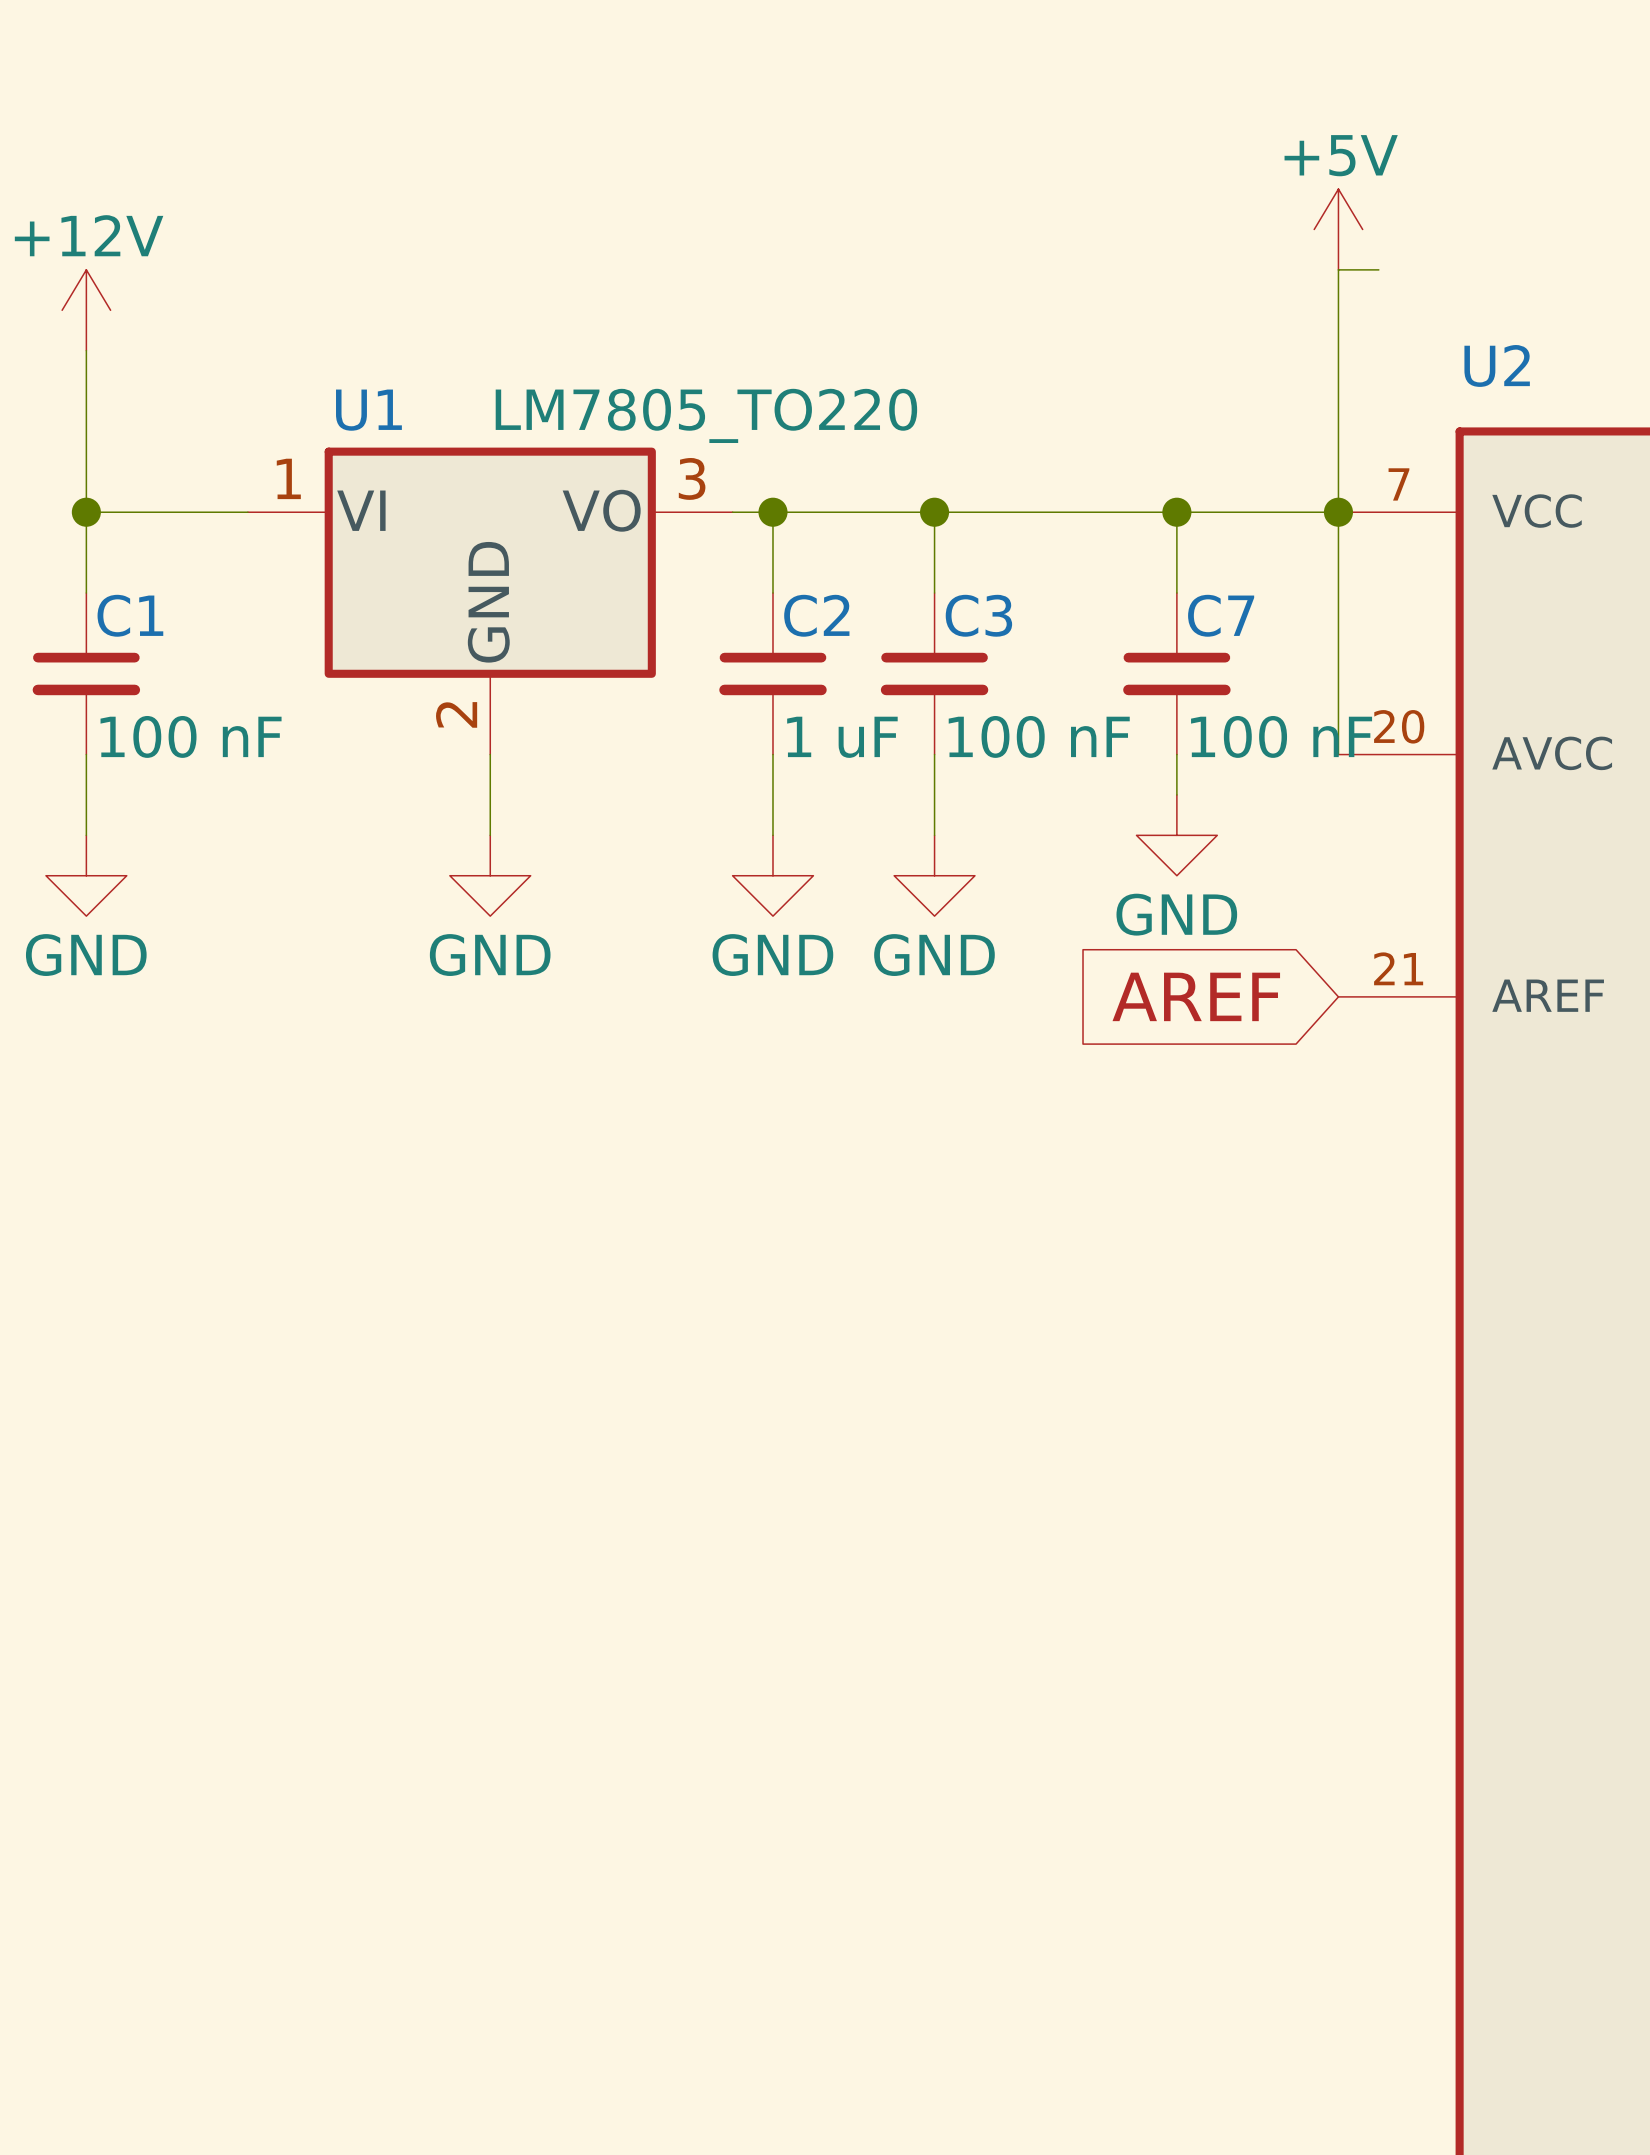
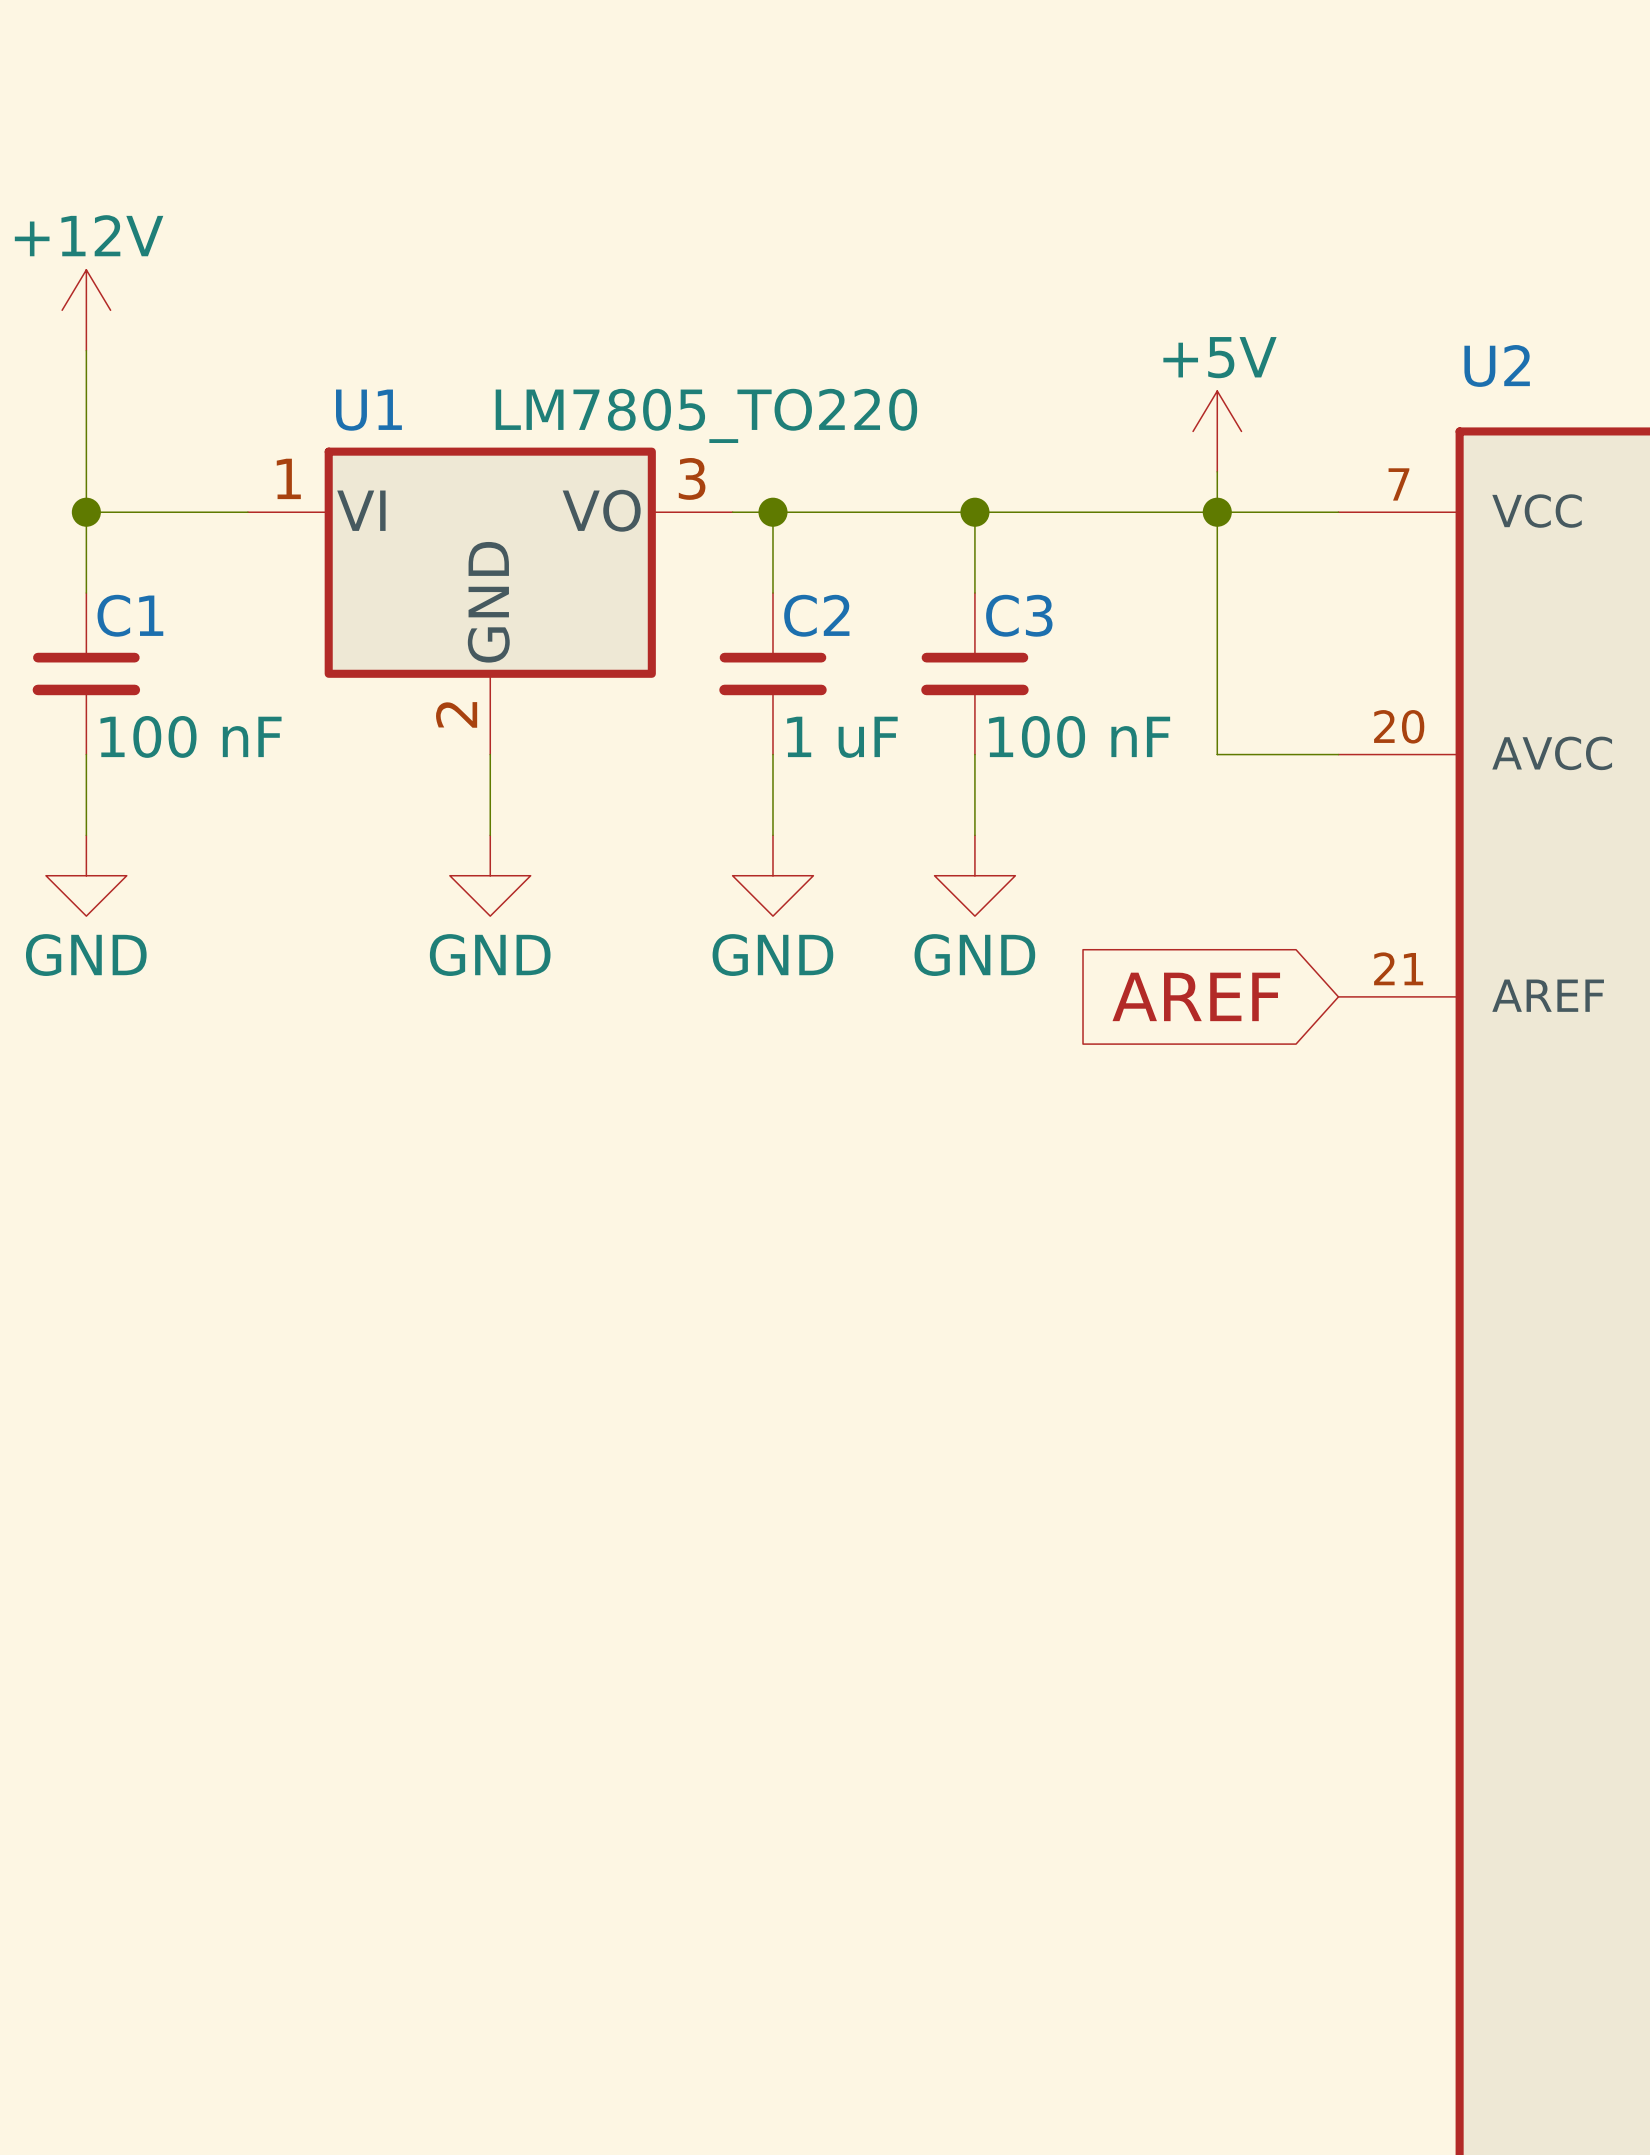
power symbol position: +5V (1338, 229) -> +5V (1217, 431)
wire: (1378, 269) (1338, 269) (1338, 754) -> (1217, 471) (1217, 754) (1338, 754)
wire: (934, 512) (934, 593) -> (974, 512) (974, 593)
junction position: (934, 512) -> (974, 512)
wire: (1176, 512) (1176, 593) -> none
junction position: (1176, 512) -> (1217, 512)
junction: (1338, 512) -> none
C3 position: (934, 673) -> (974, 673)
C7: 100 nF (1176, 673) -> none
wire: (934, 754) (934, 835) -> (974, 754) (974, 835)
wire: (1176, 754) (1176, 794) -> none
power symbol: GND (1176, 835) -> none
power symbol position: GND (934, 875) -> GND (974, 875)

